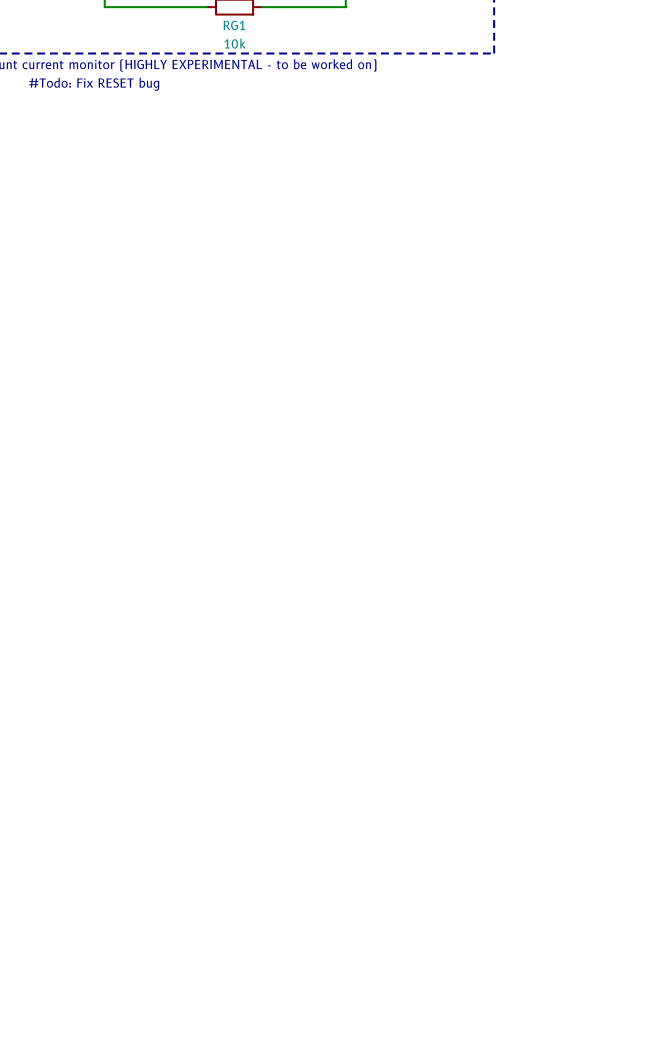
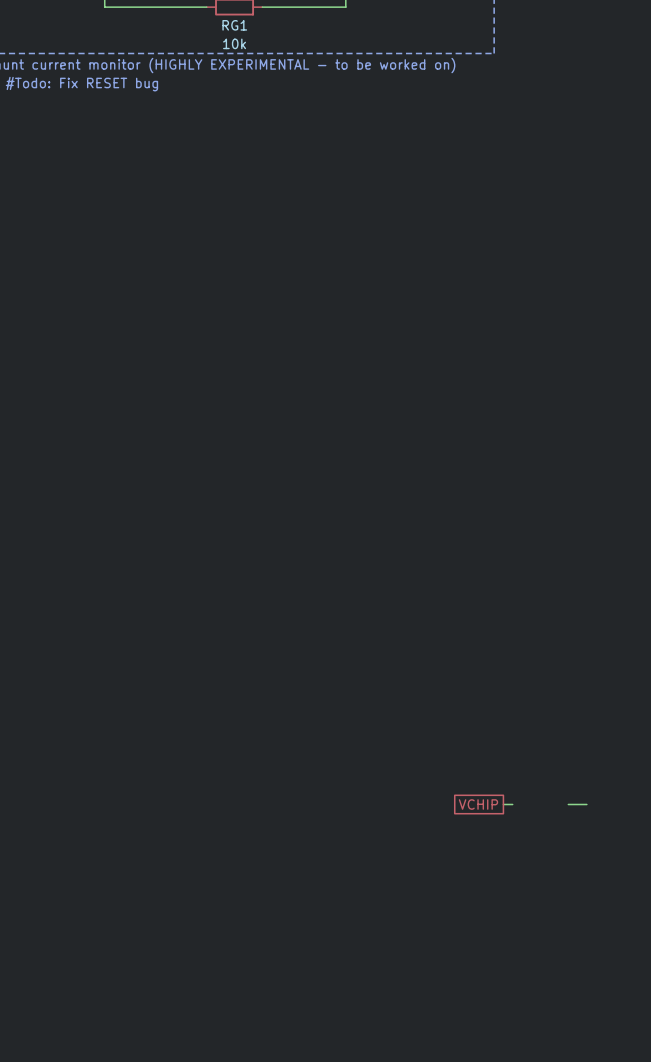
global label: none -> VCHIP (478, 804)
wire: none -> (503, 804) (512, 804)
wire: none -> (568, 804) (586, 804)

